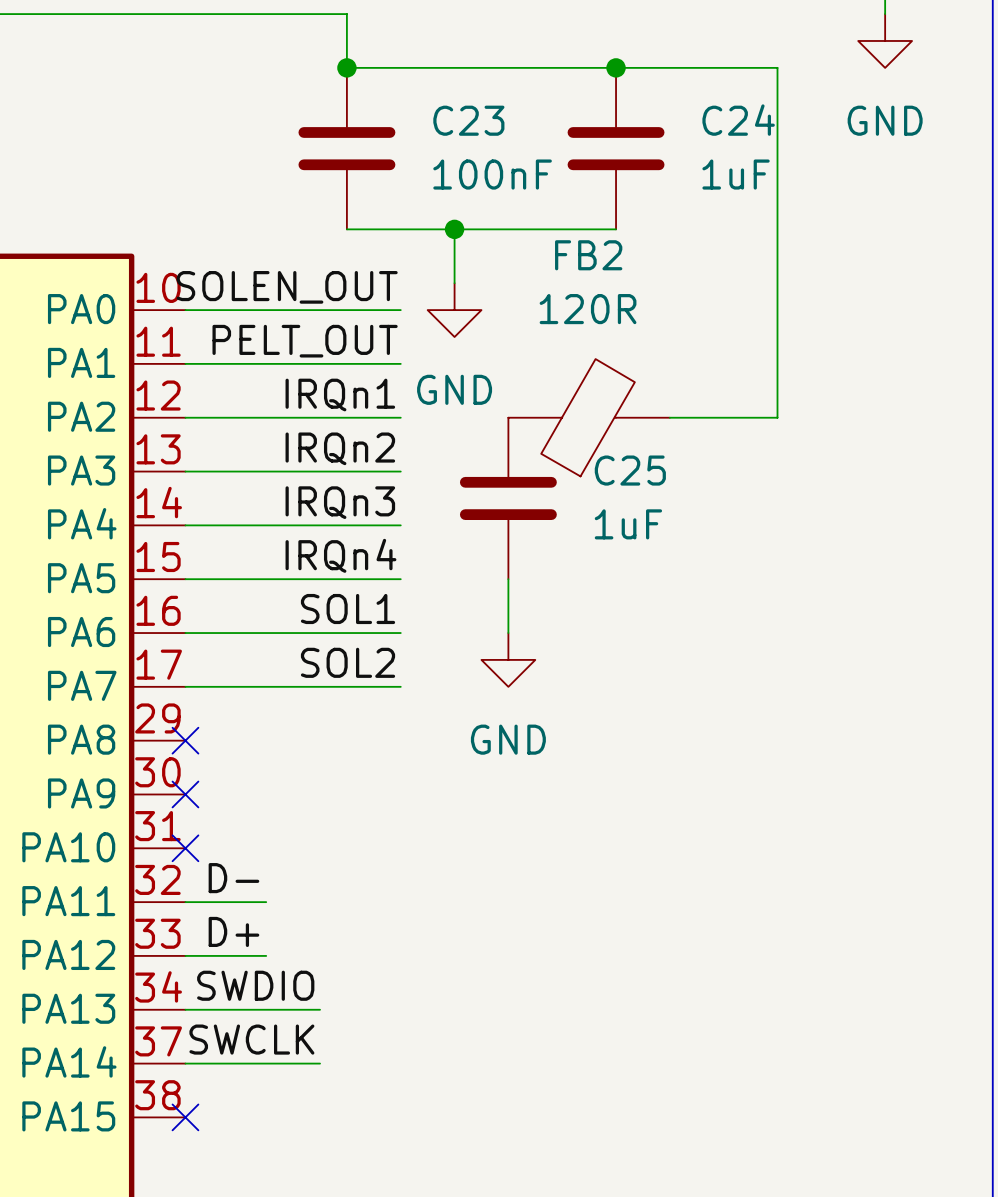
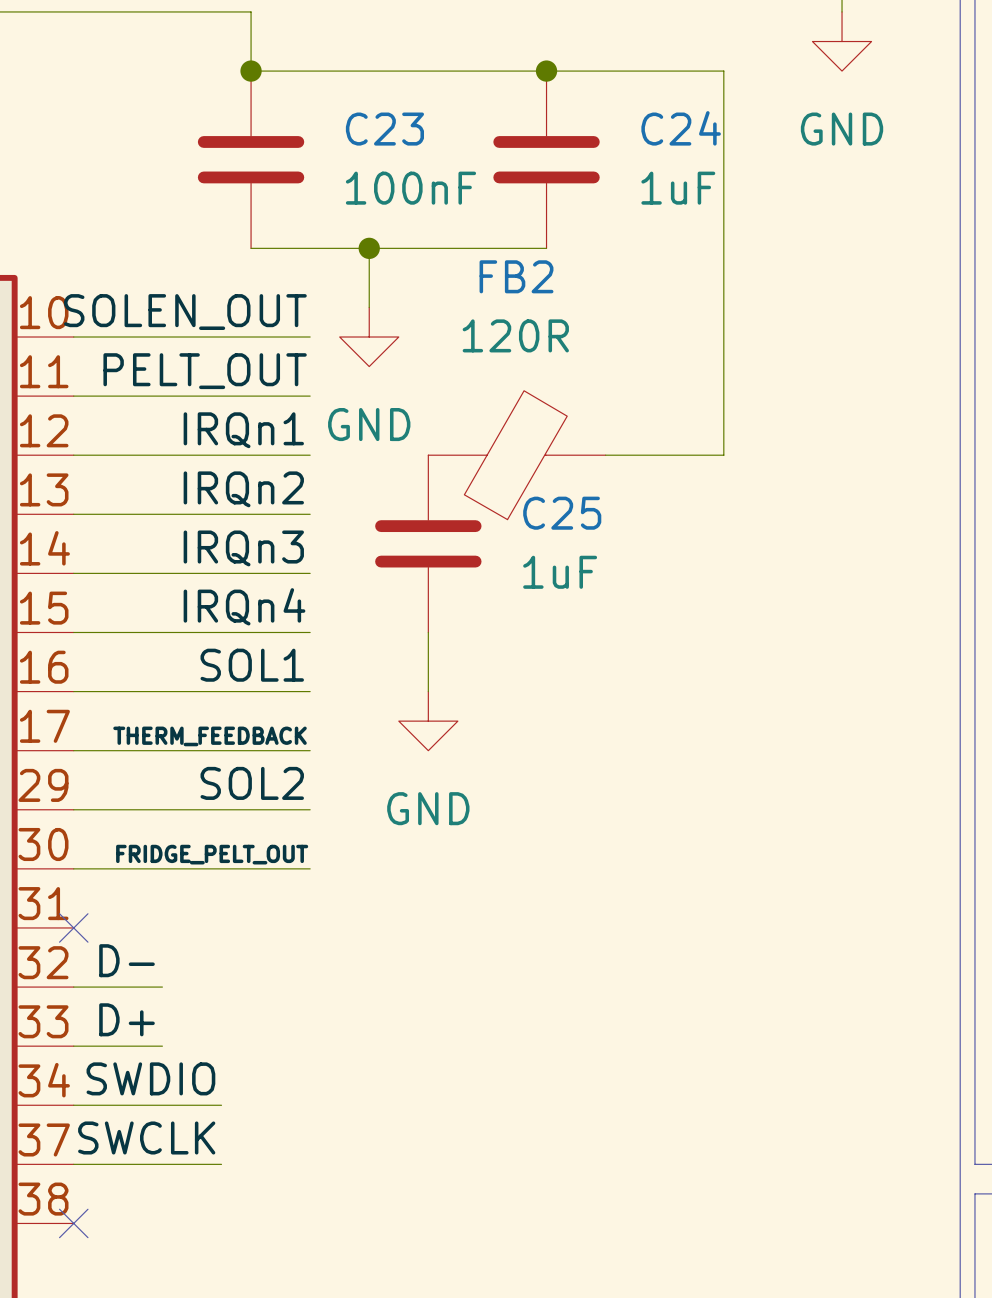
label: SOL2 (348, 662) -> THERM_FEEDBACK (210, 736)
label: none -> SOL2 (252, 783)
wire: none -> (73, 809) (310, 809)
no-connect mark: (185, 740) -> none
label: none -> FRIDGE_PELT_OUT (212, 854)
wire: none -> (73, 868) (310, 868)
no-connect mark: (185, 794) -> none

